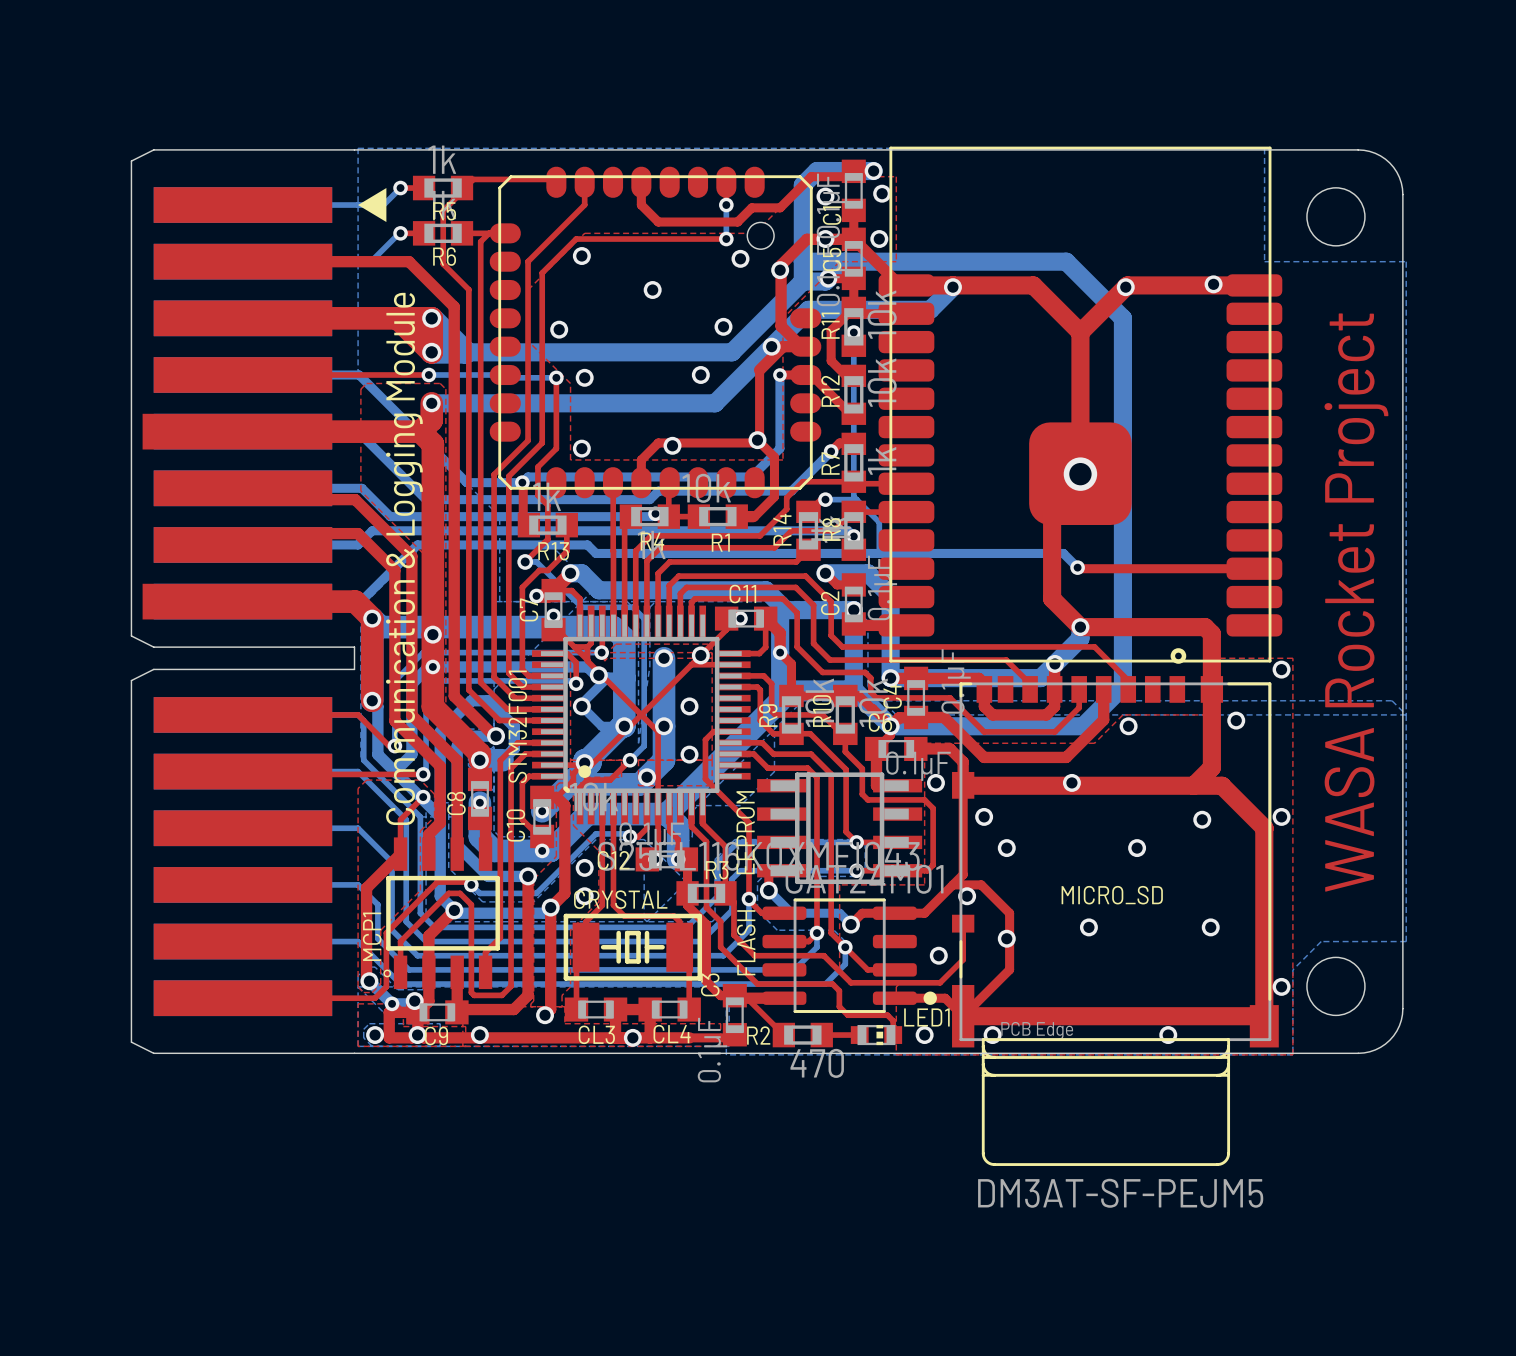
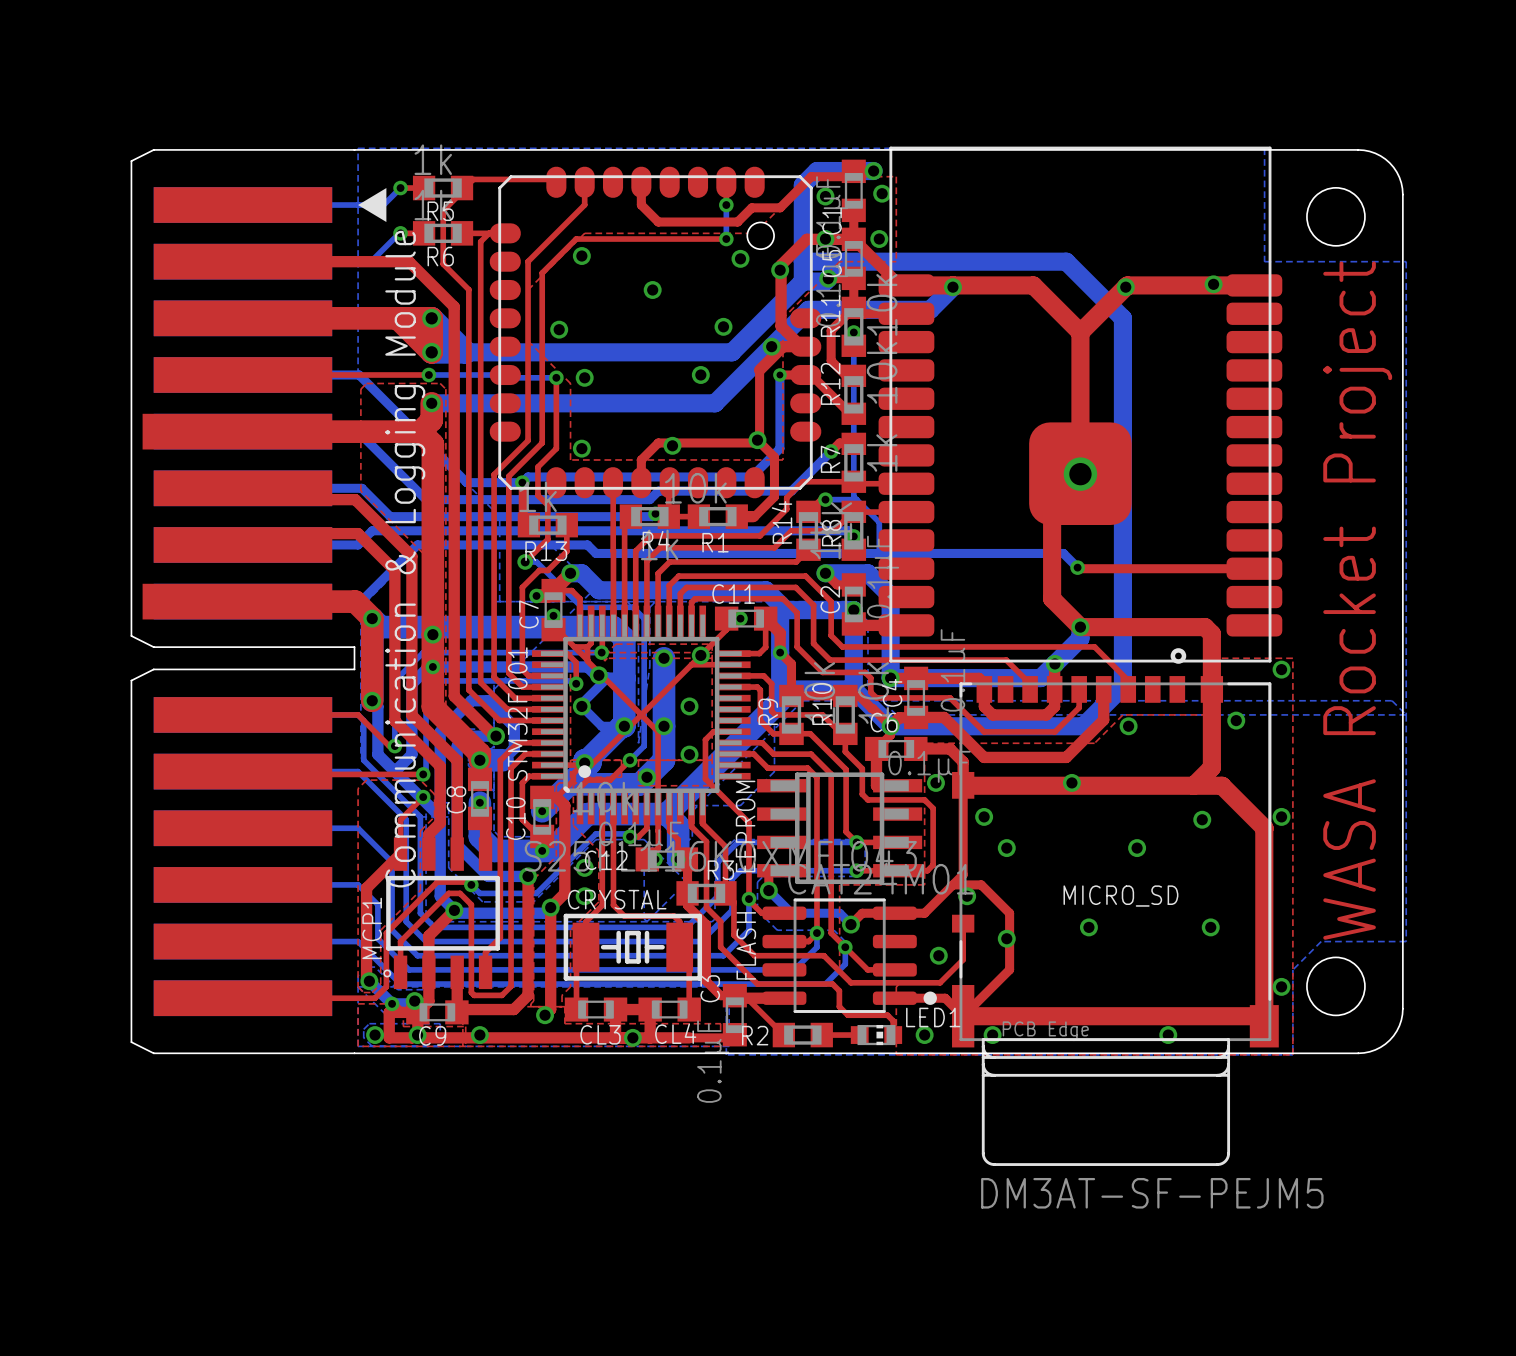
R2 value: 470 (817, 1063) -> none

